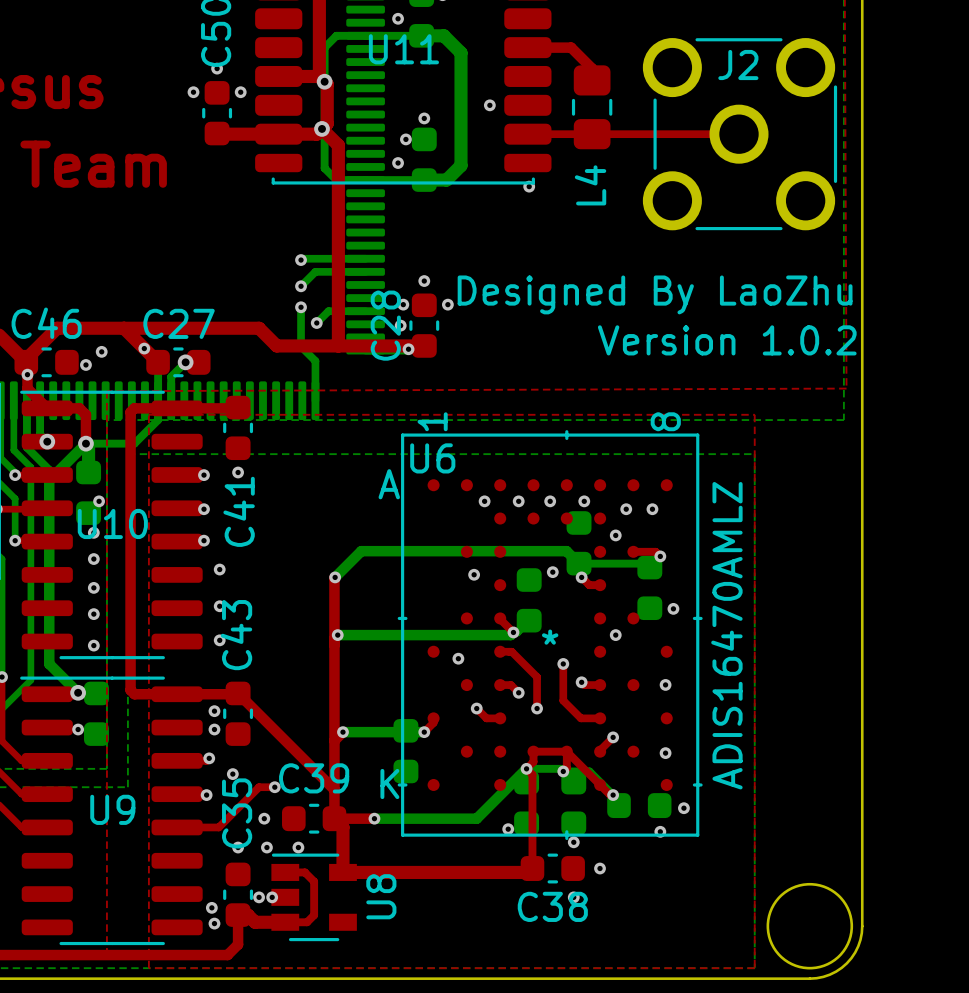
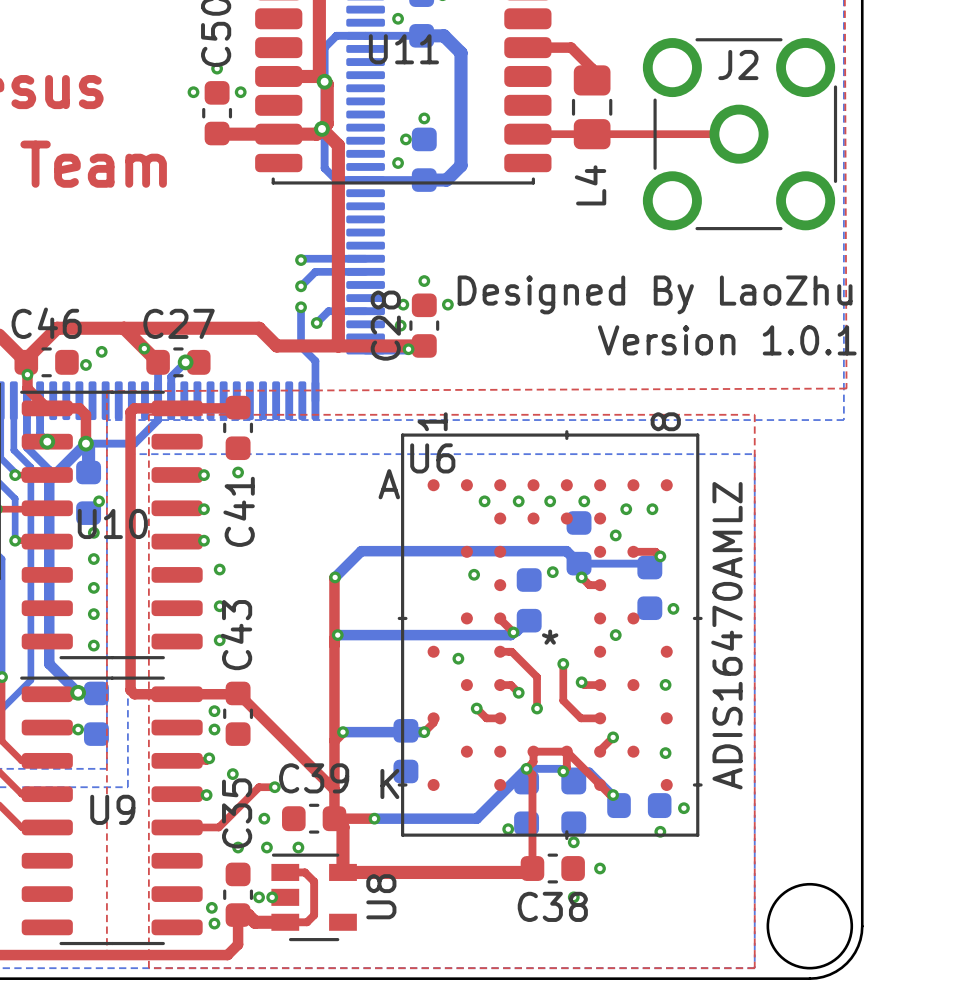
via: (489, 105) -> none
via: (529, 186) -> none
text: Version 1.0.2 (727, 340) -> Version 1.0.1 (727, 340)

